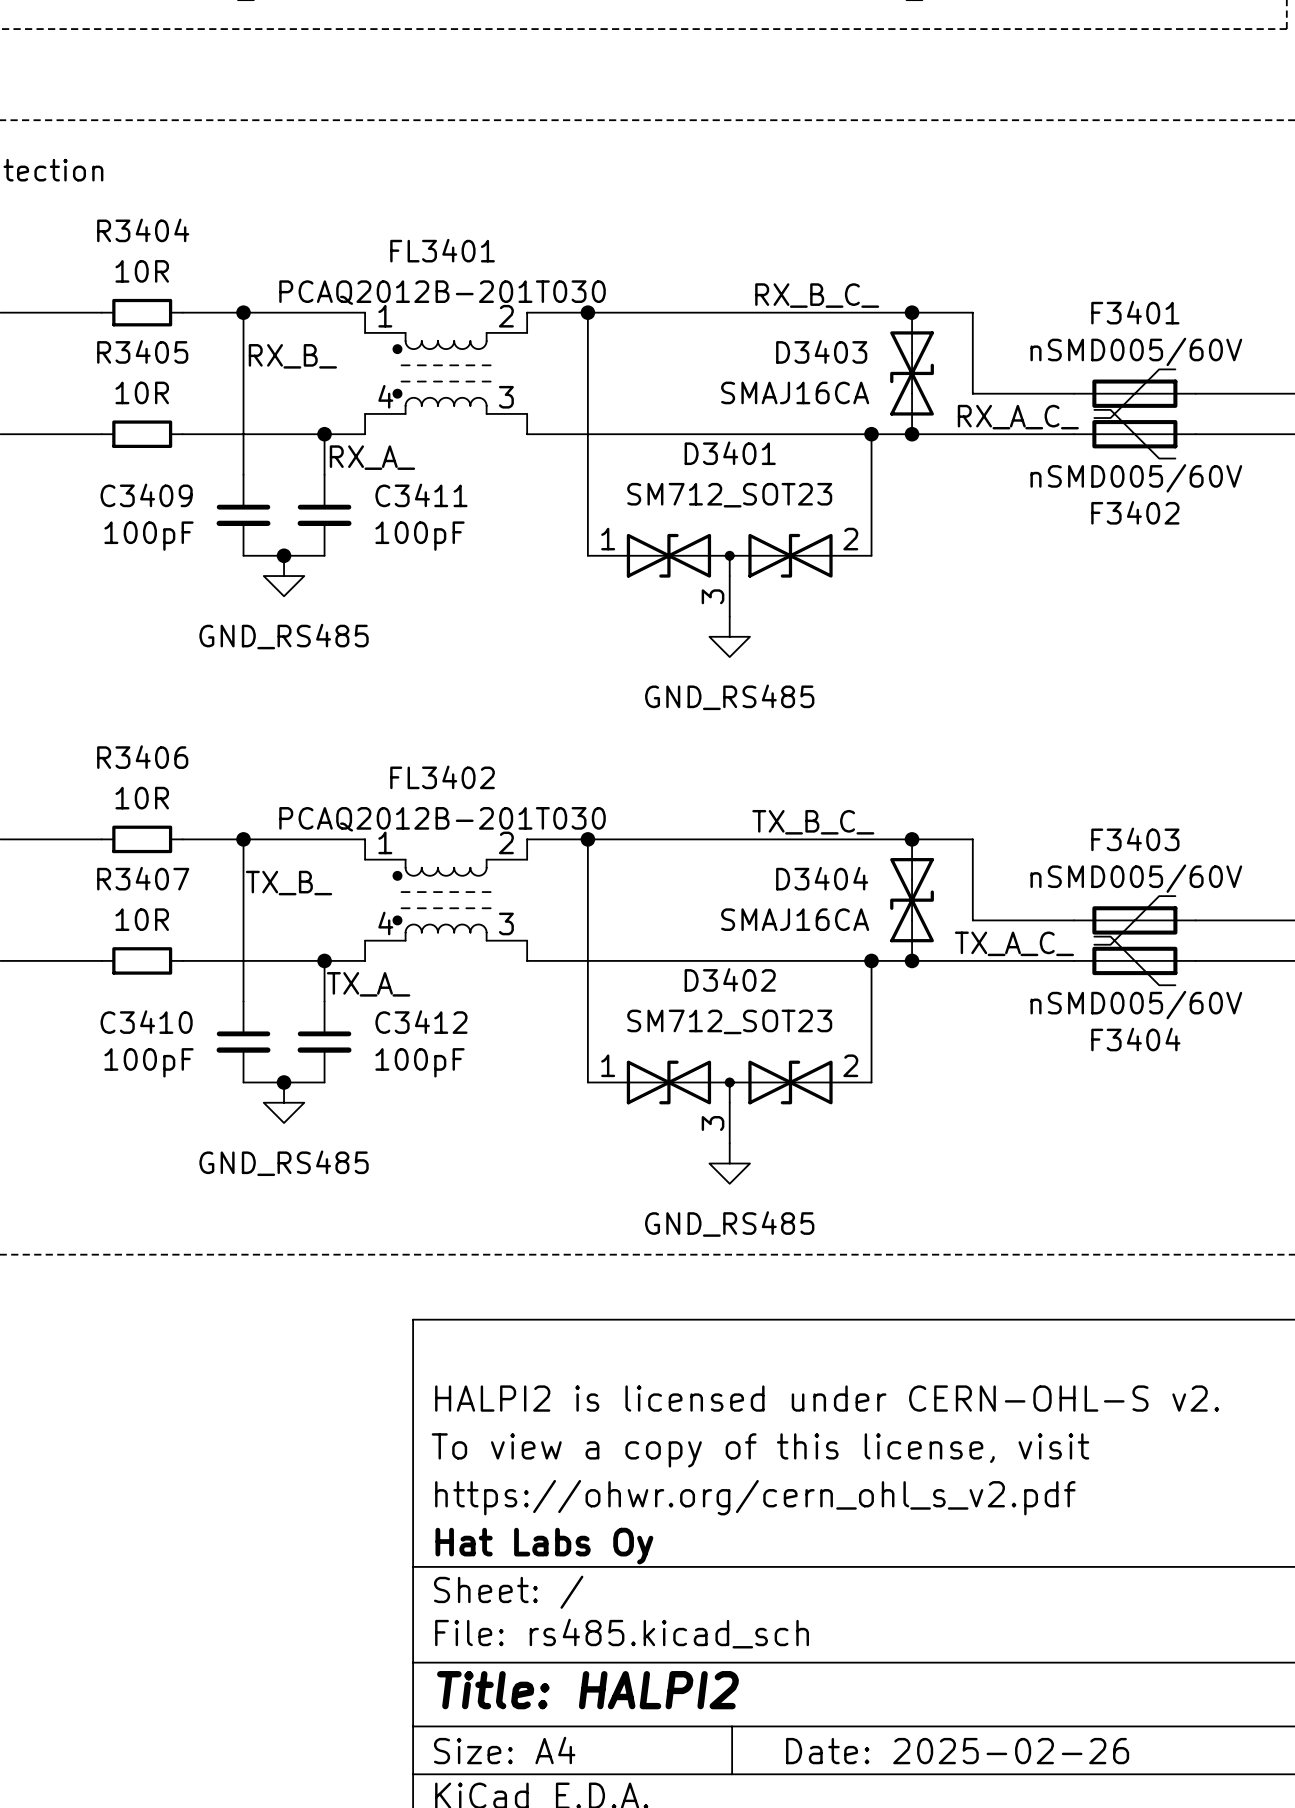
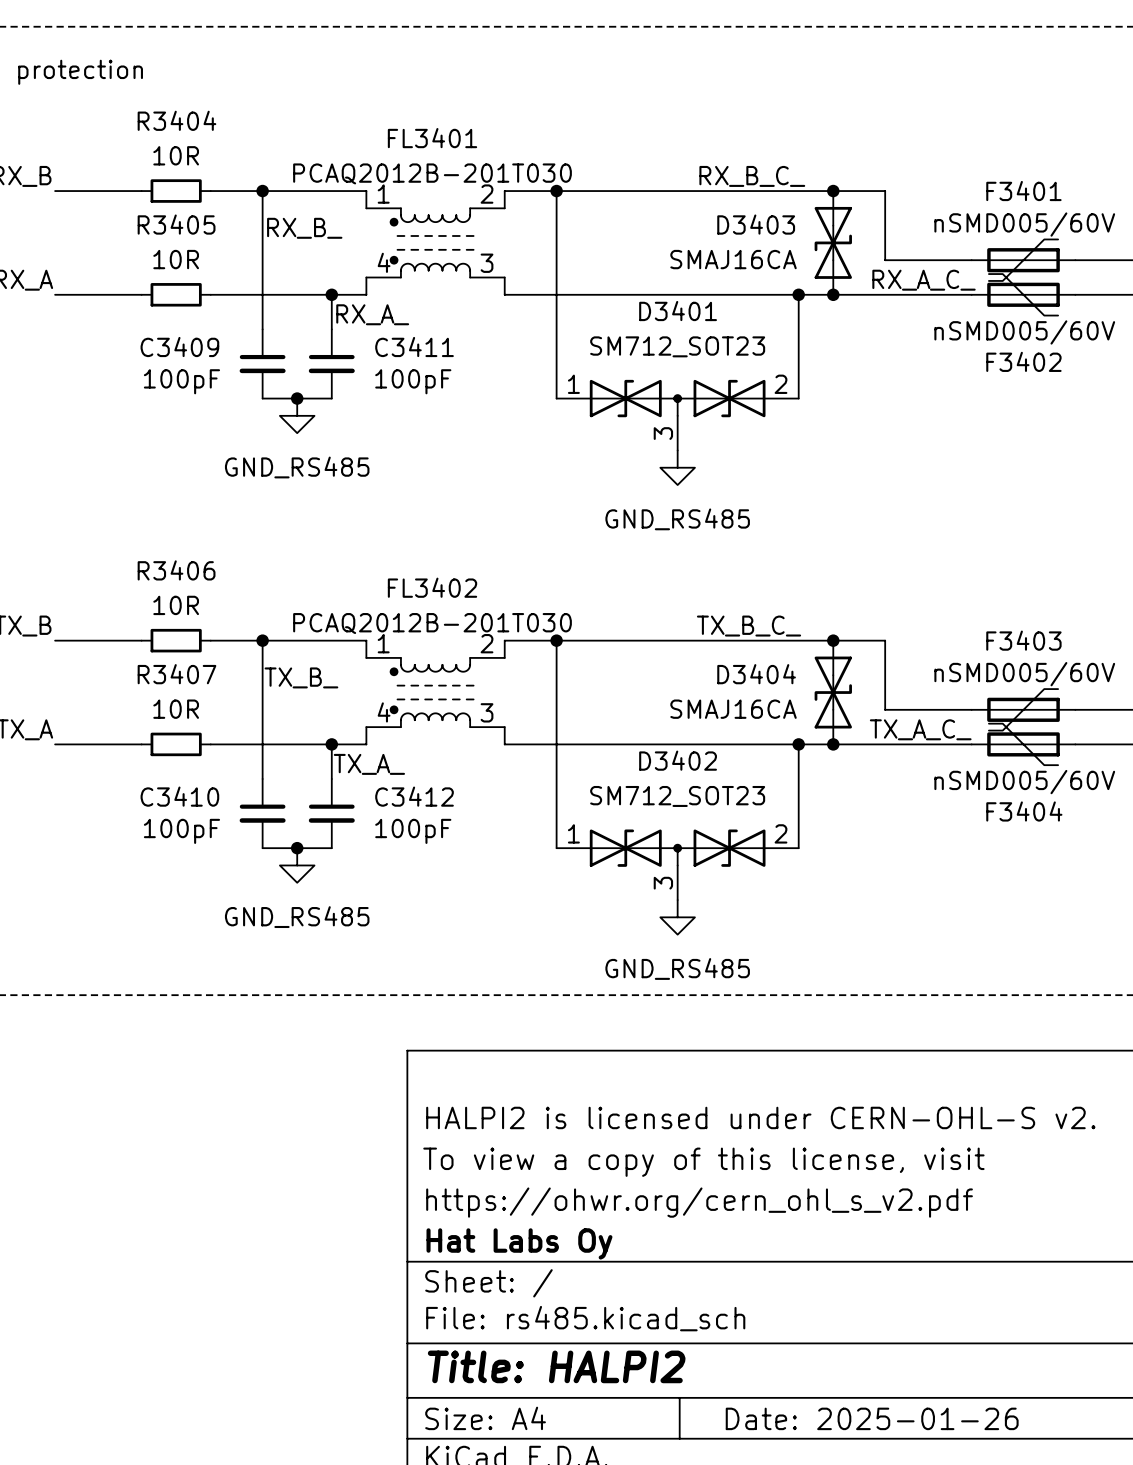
title block: Date: 2025-02-26 (957, 1751) -> Date: 2025-01-26 (872, 1418)

